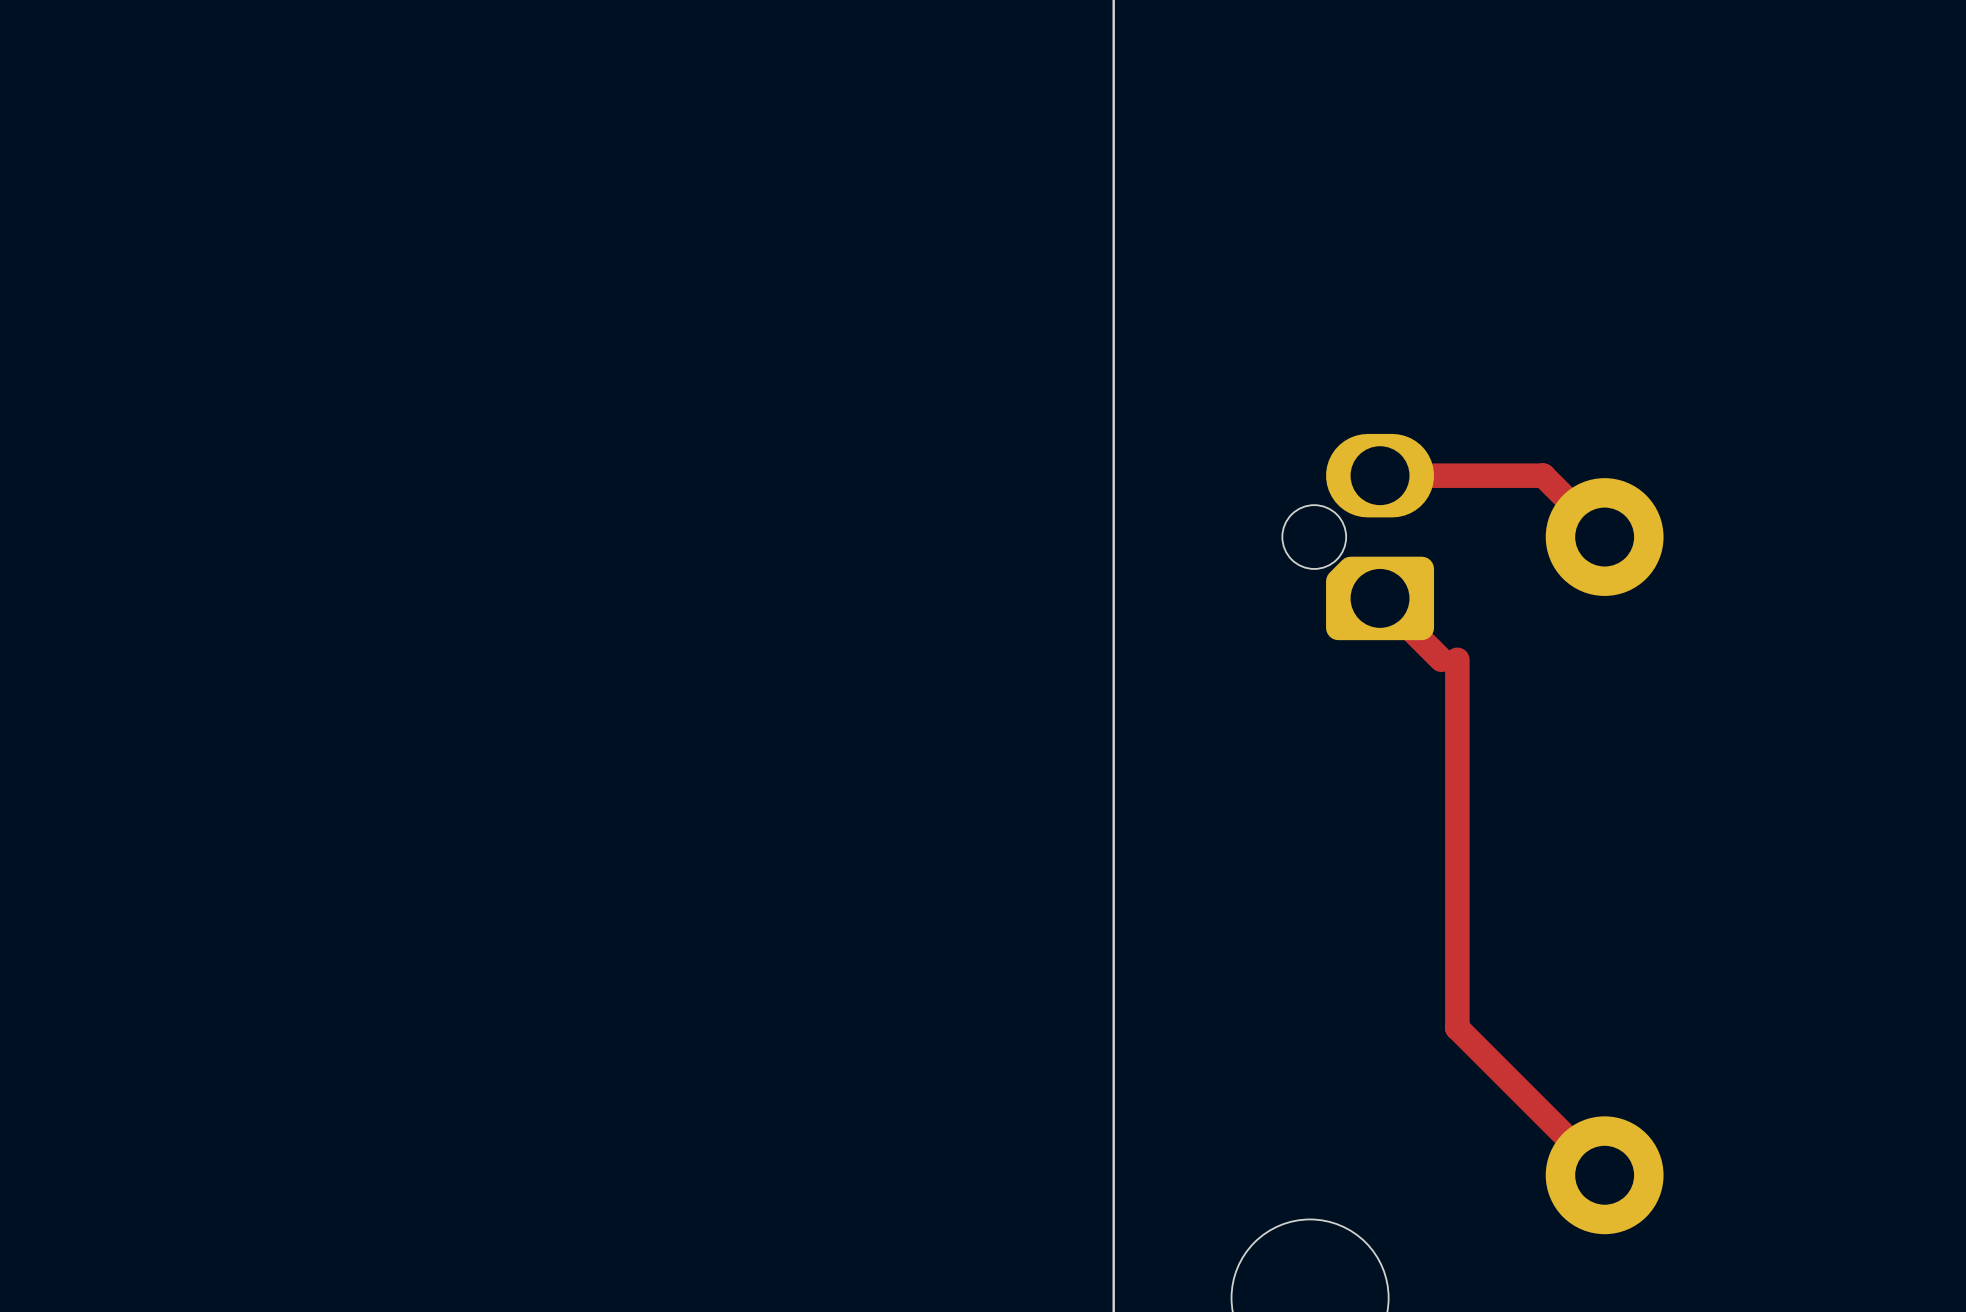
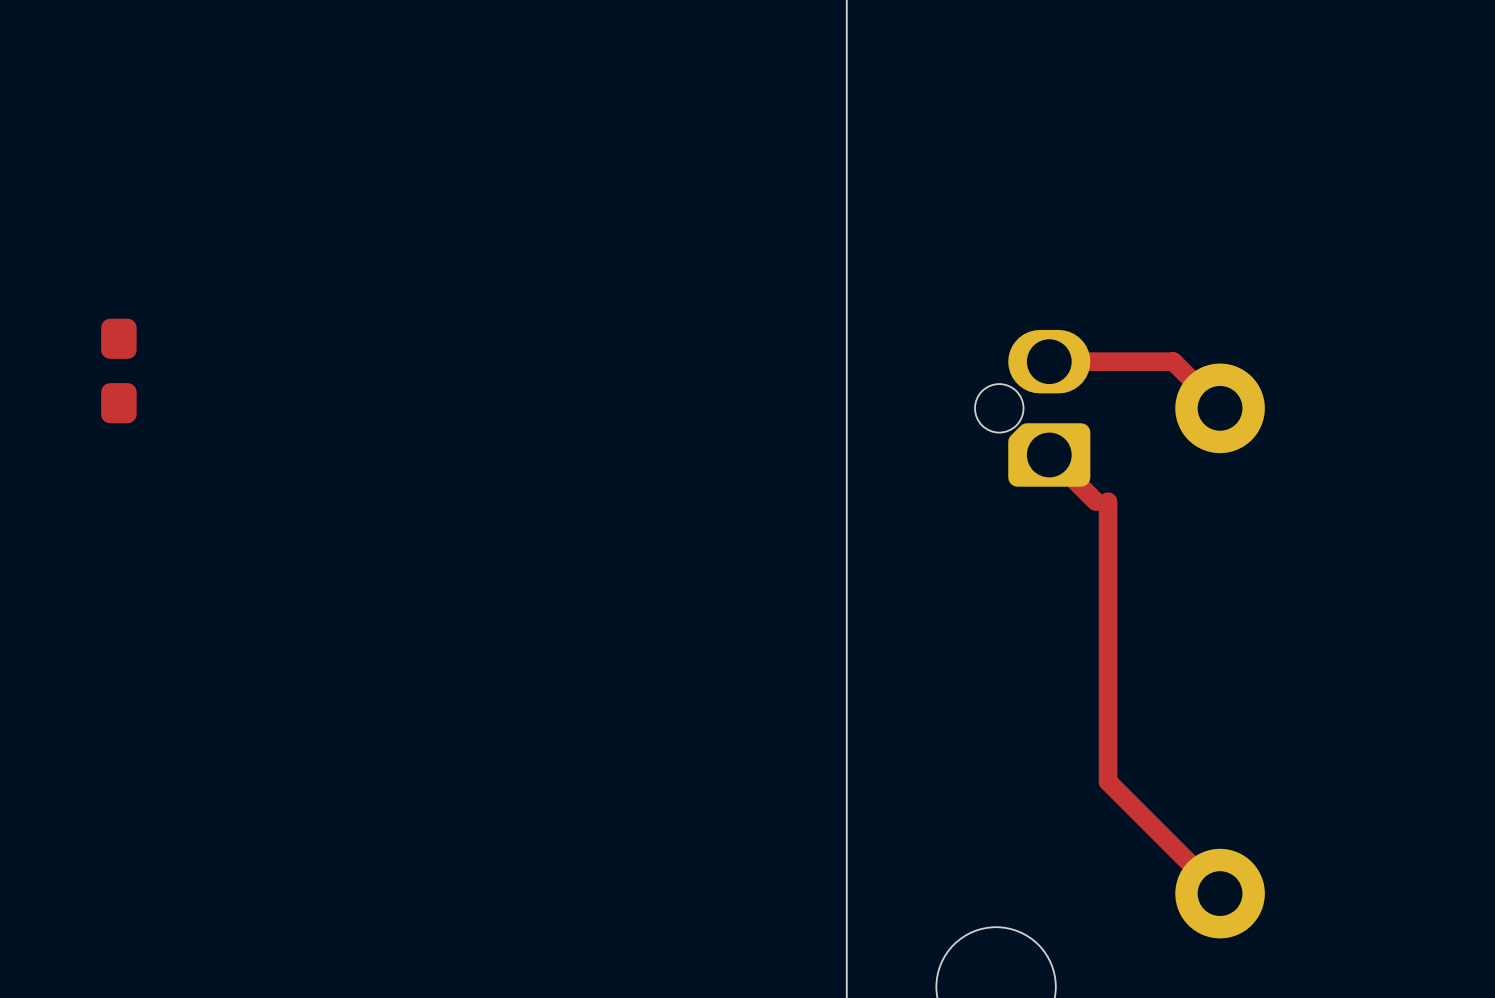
part: none -> (118, 371)

